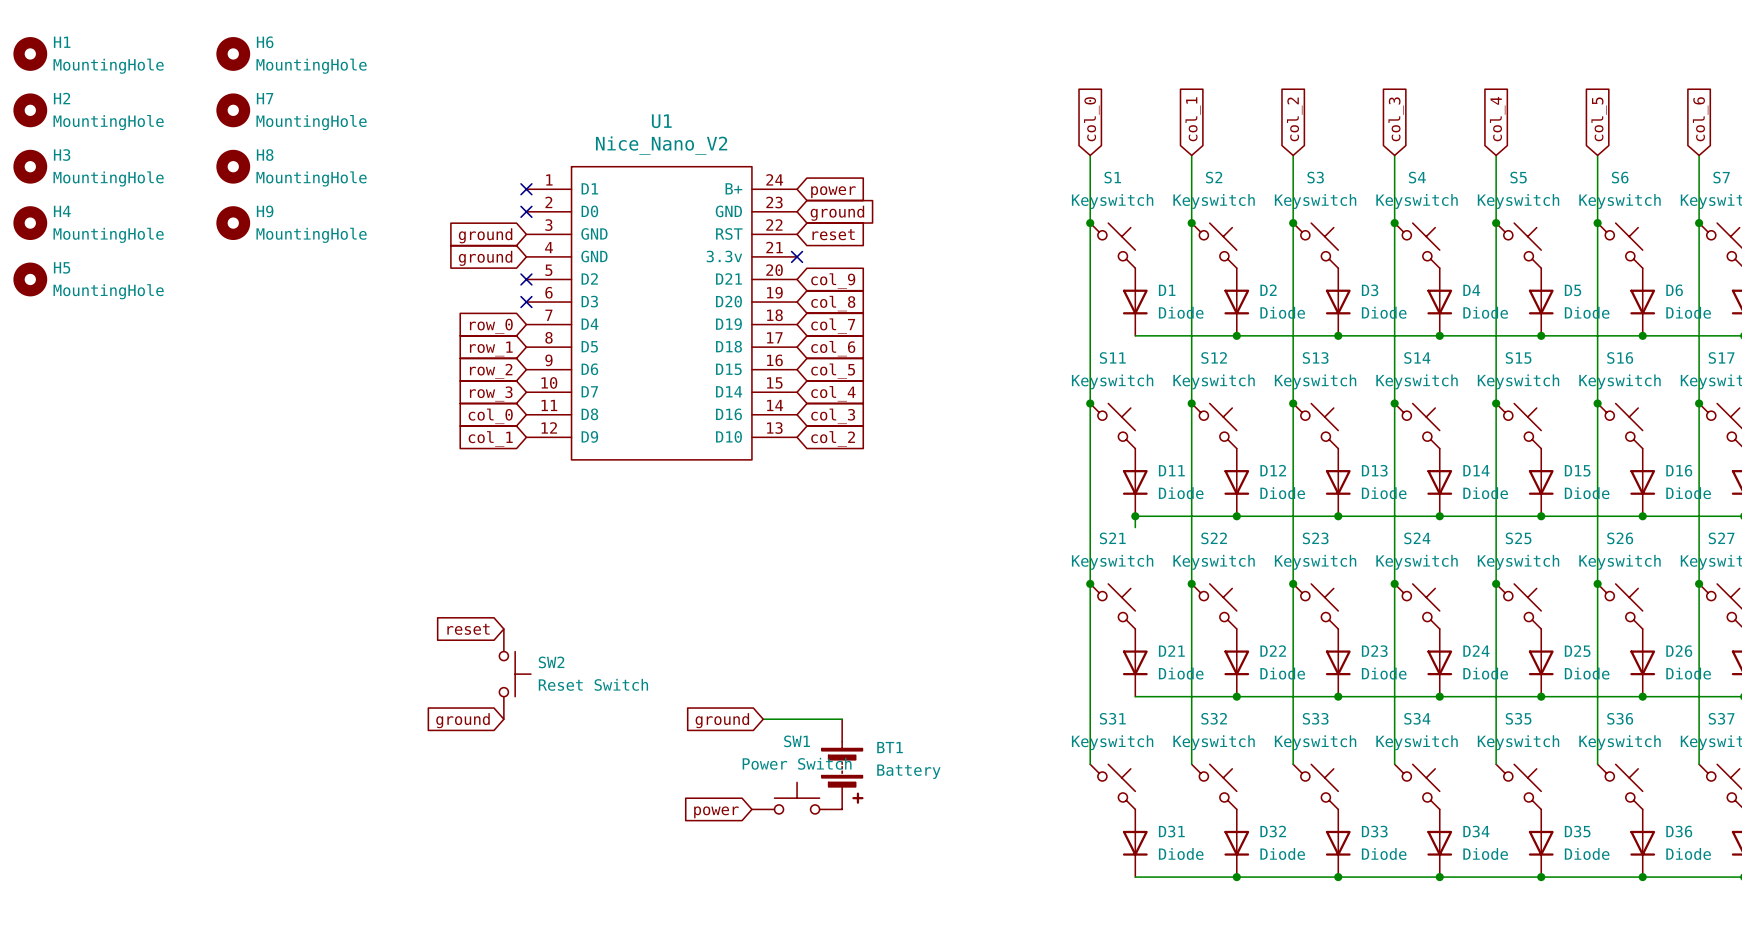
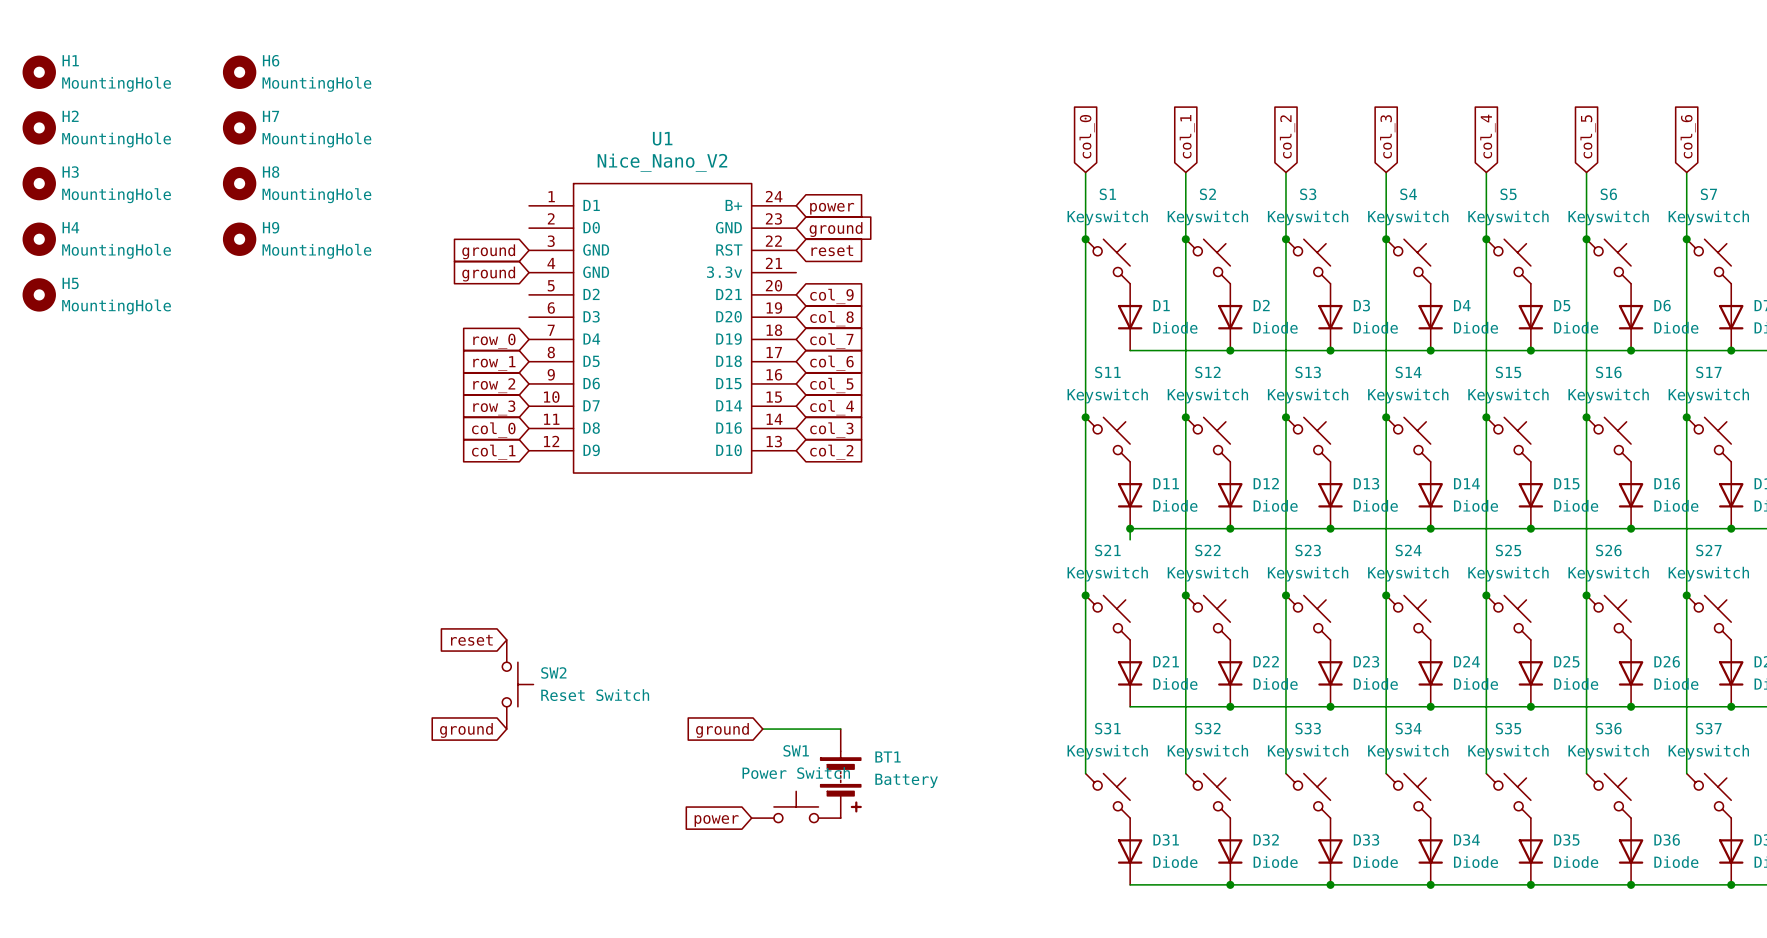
no-connect mark: (526, 189) -> none
no-connect mark: (526, 211) -> none
no-connect mark: (797, 256) -> none
no-connect mark: (526, 279) -> none
no-connect mark: (526, 302) -> none

